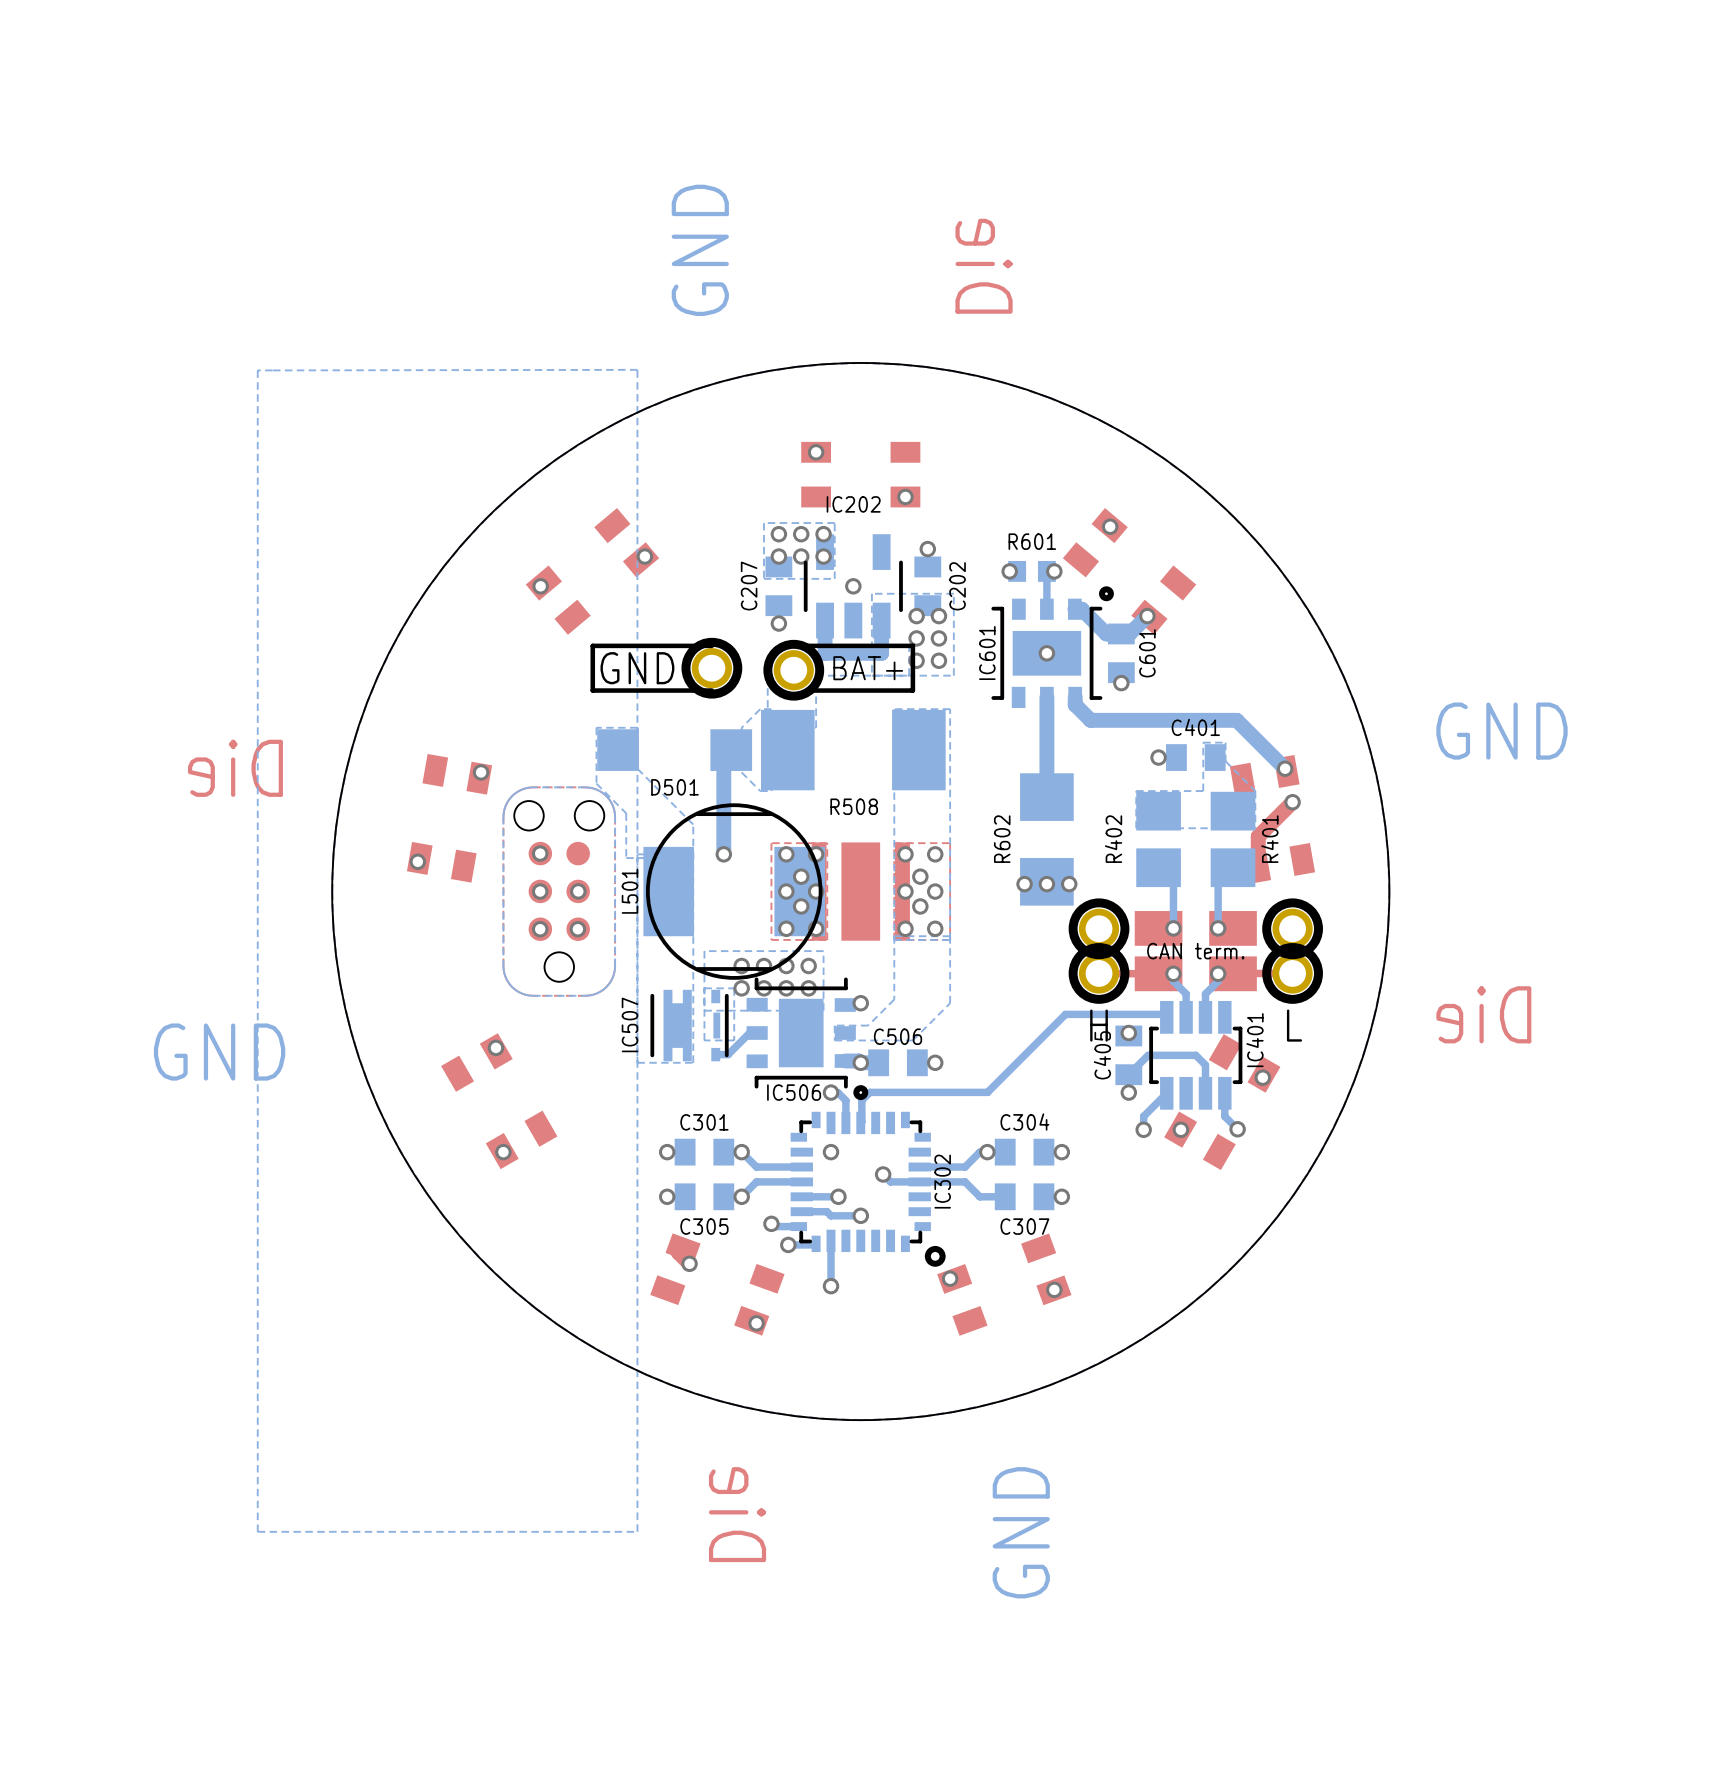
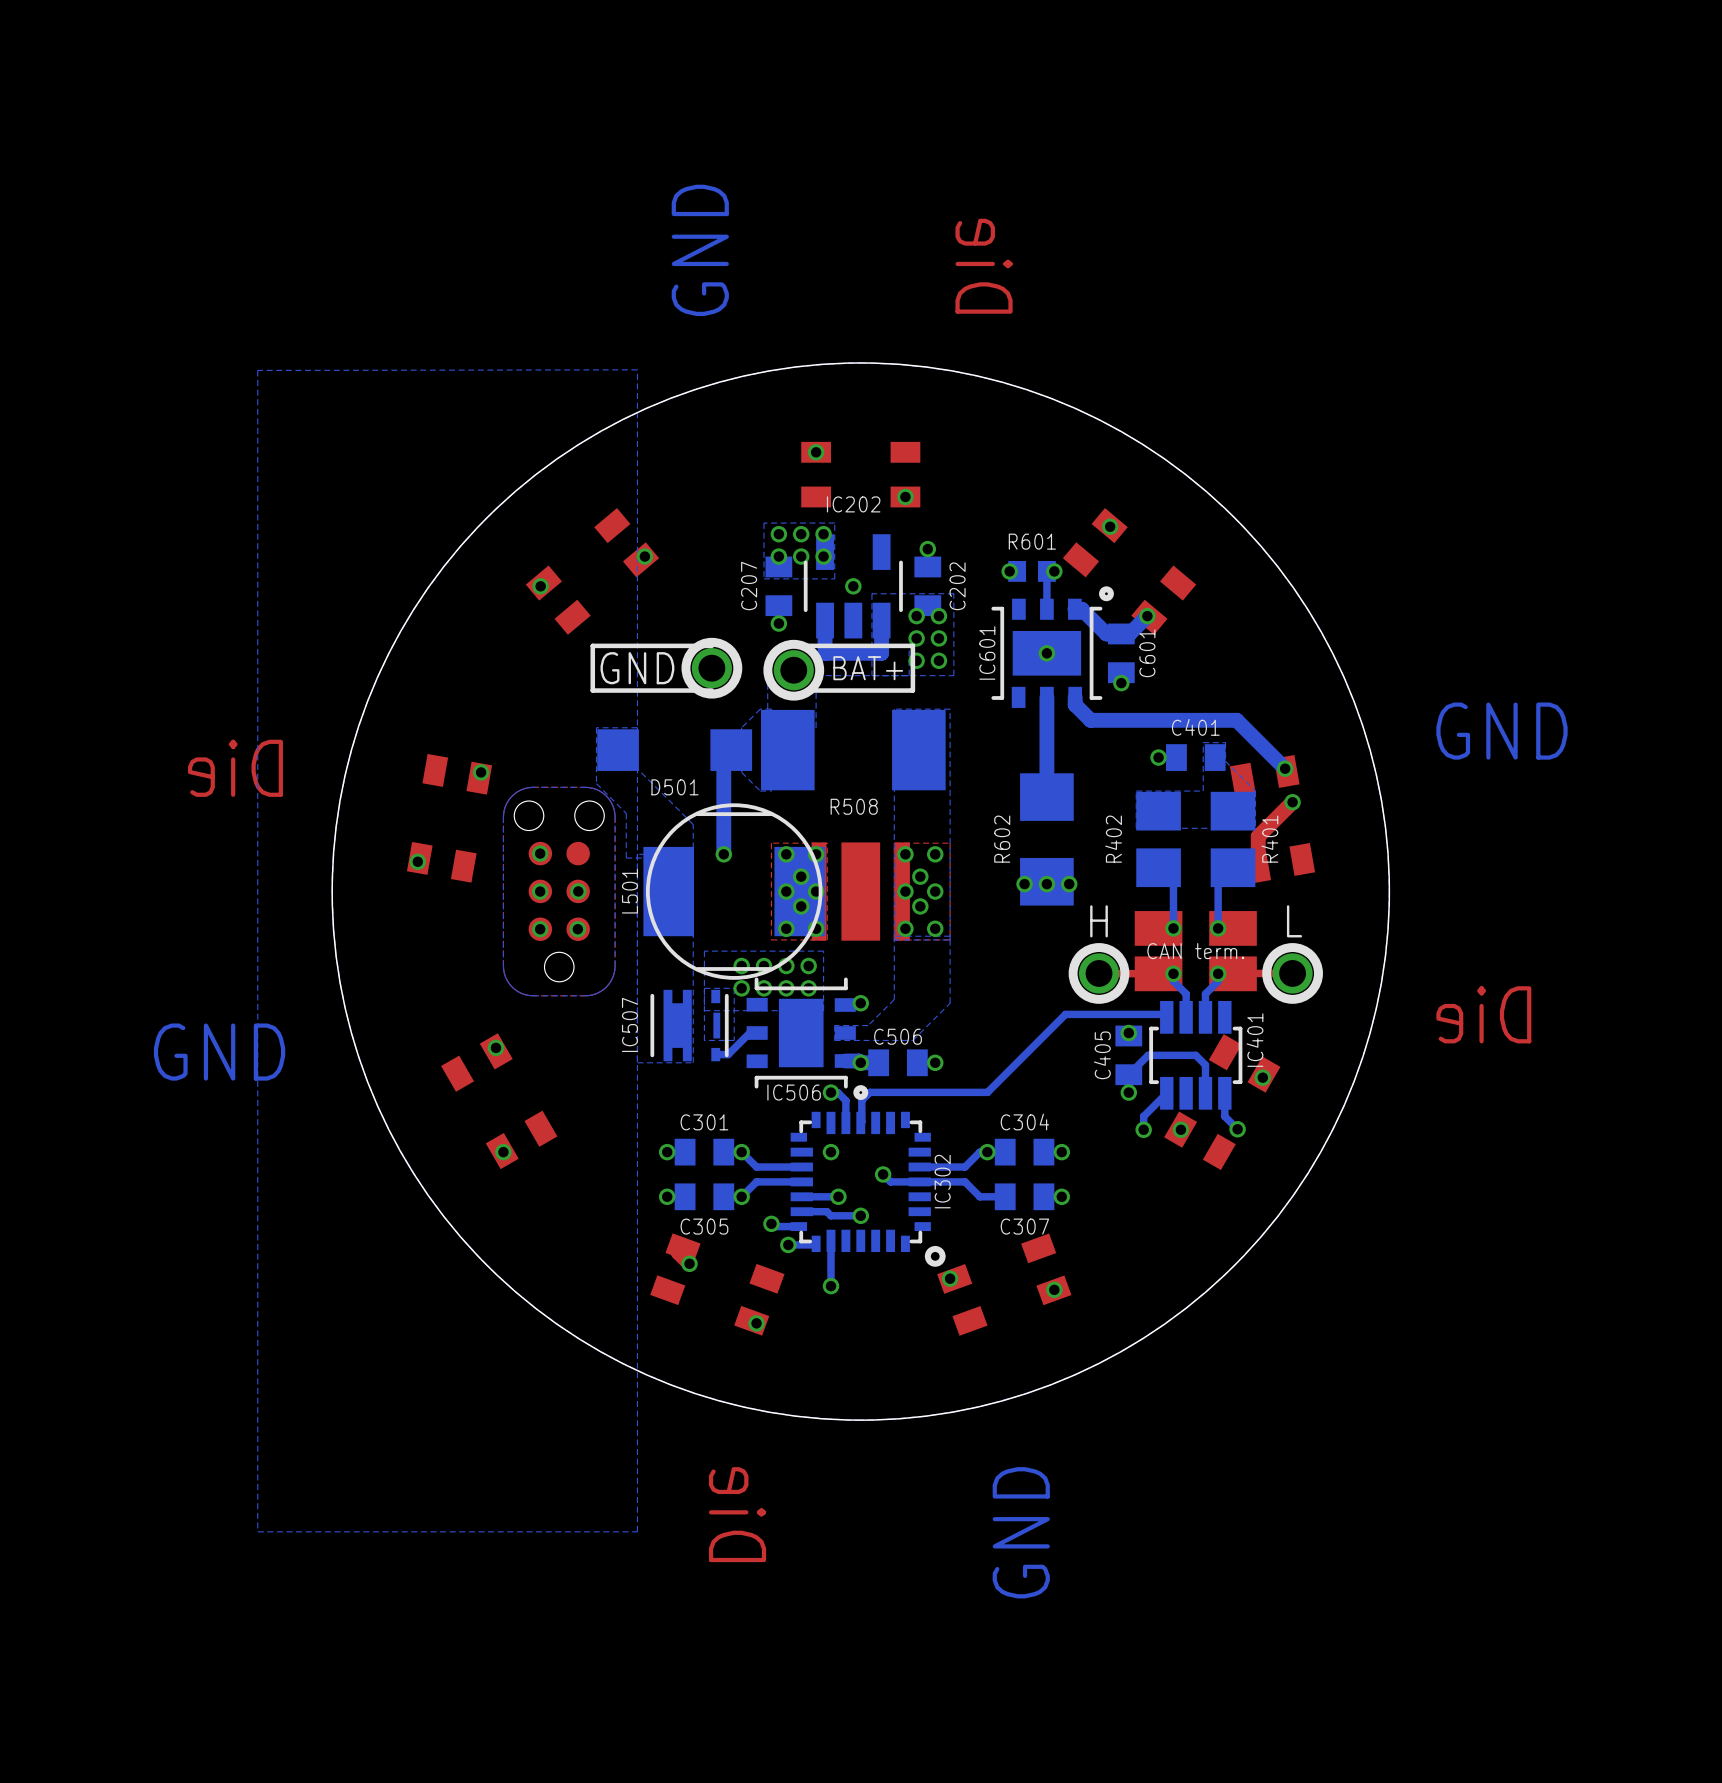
part: (1099, 928) -> none
part: (1292, 928) -> none
text position: H (1099, 1025) -> H (1099, 921)
text position: L (1294, 1025) -> L (1294, 921)

